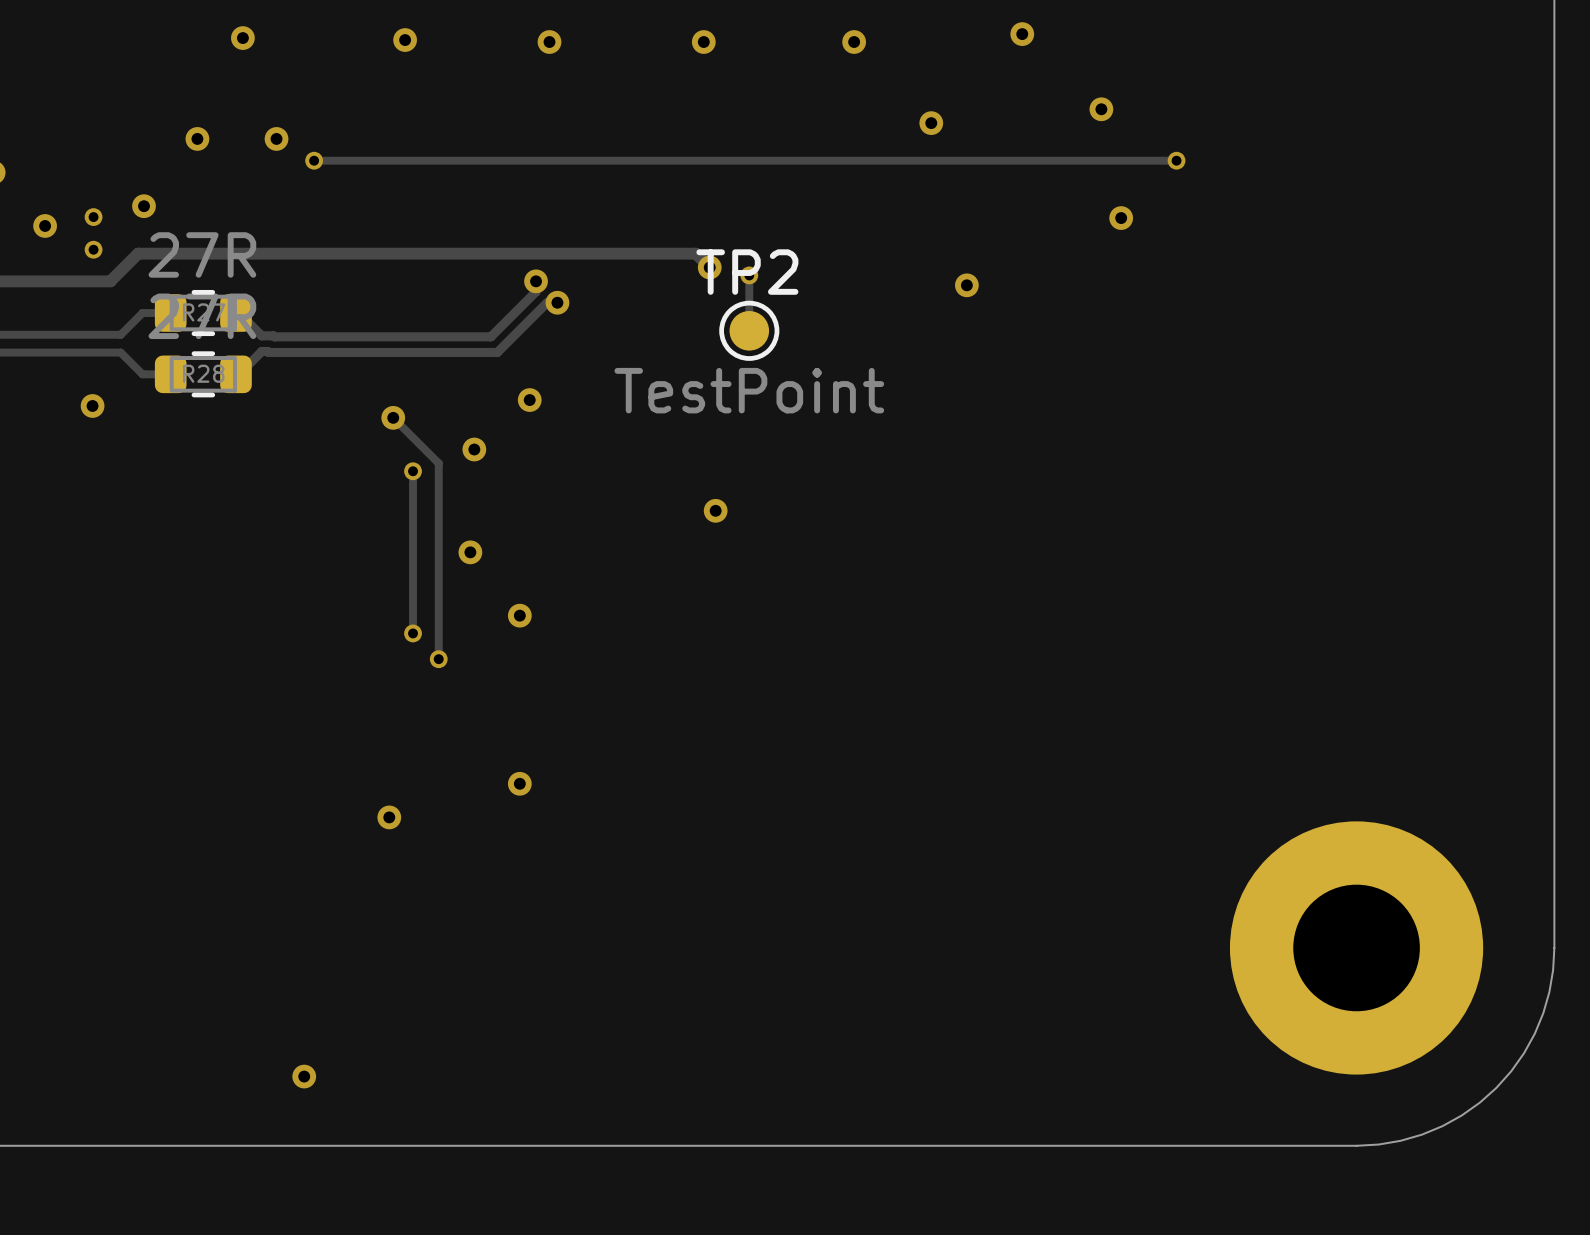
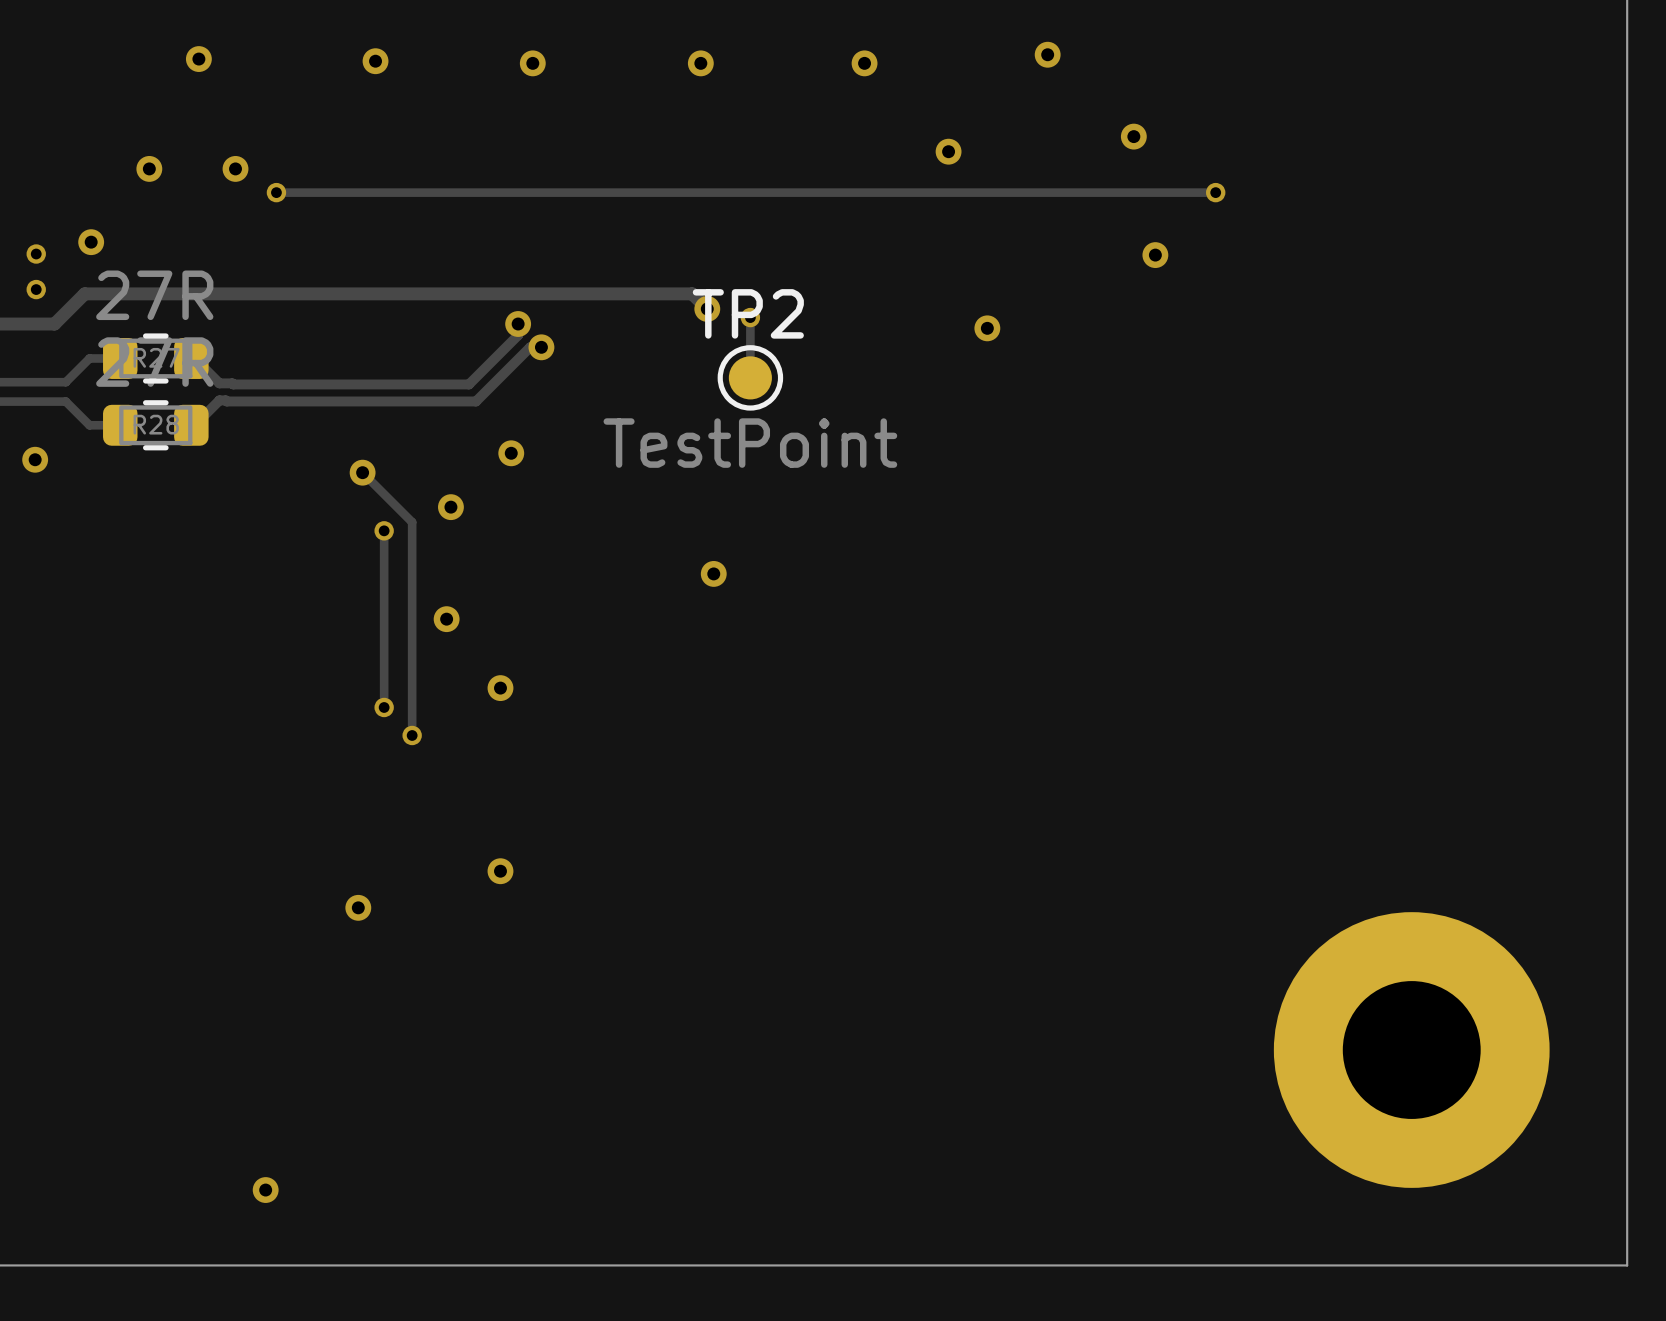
board edge: (1554, 947) (1549, 991) (1534, 1033) (1511, 1071) (1496, 1087) (1461, 1115) (1421, 1134) (1378, 1144) (1356, 1145) -> (1627, 1050) (1627, 1265) (1411, 1265)

